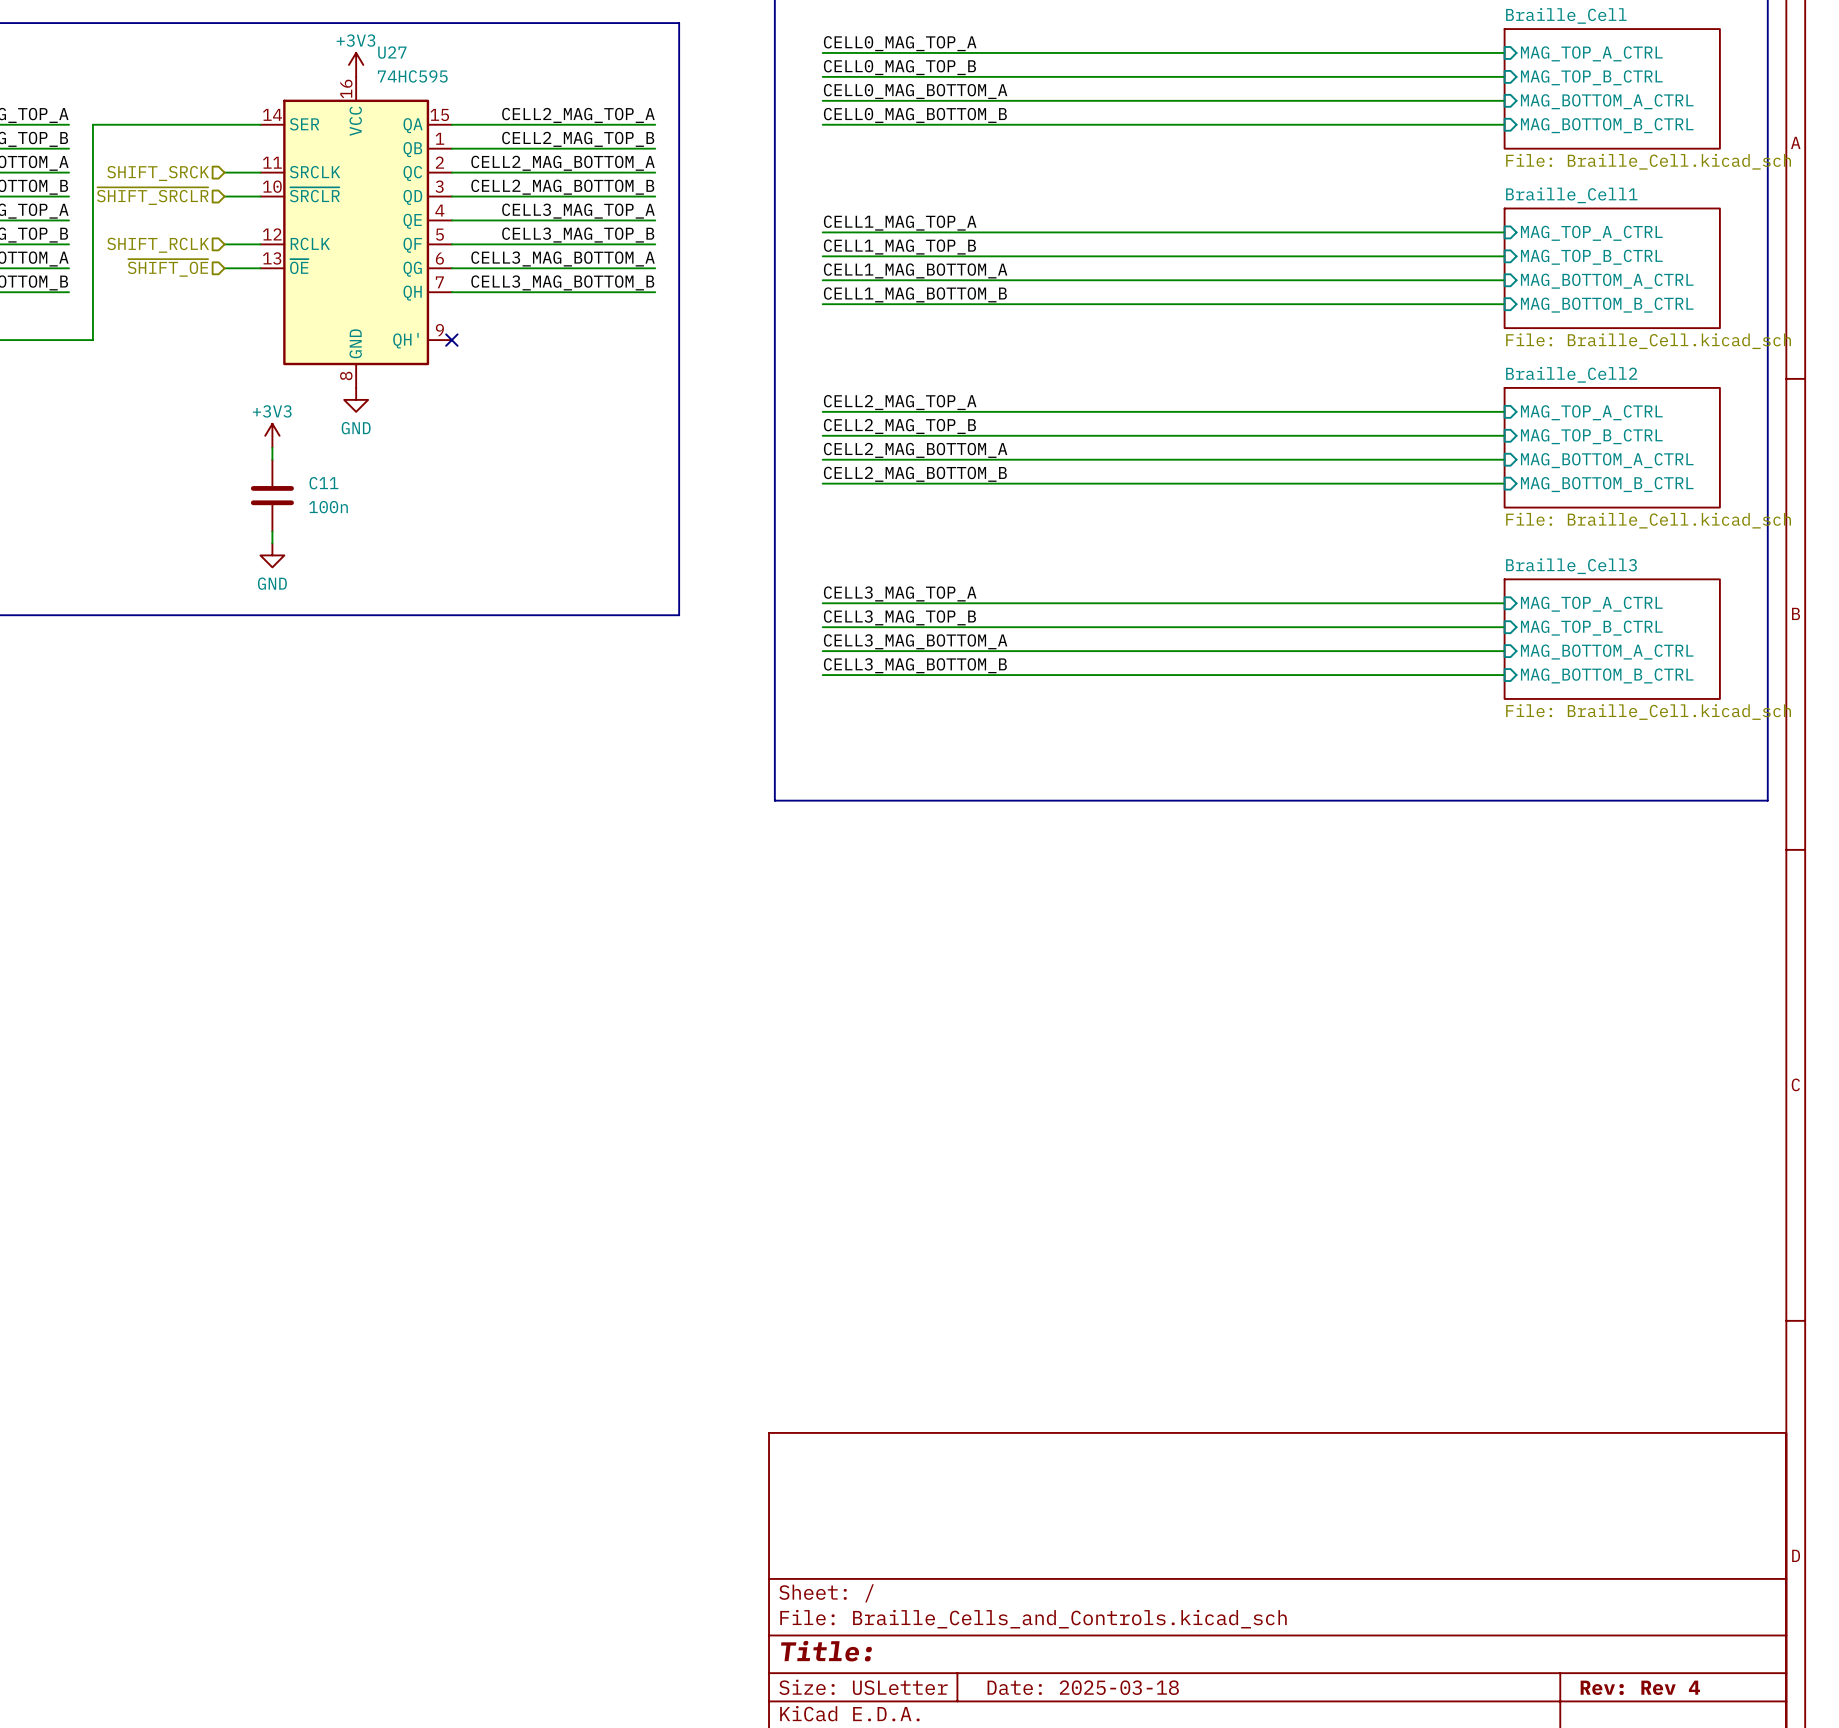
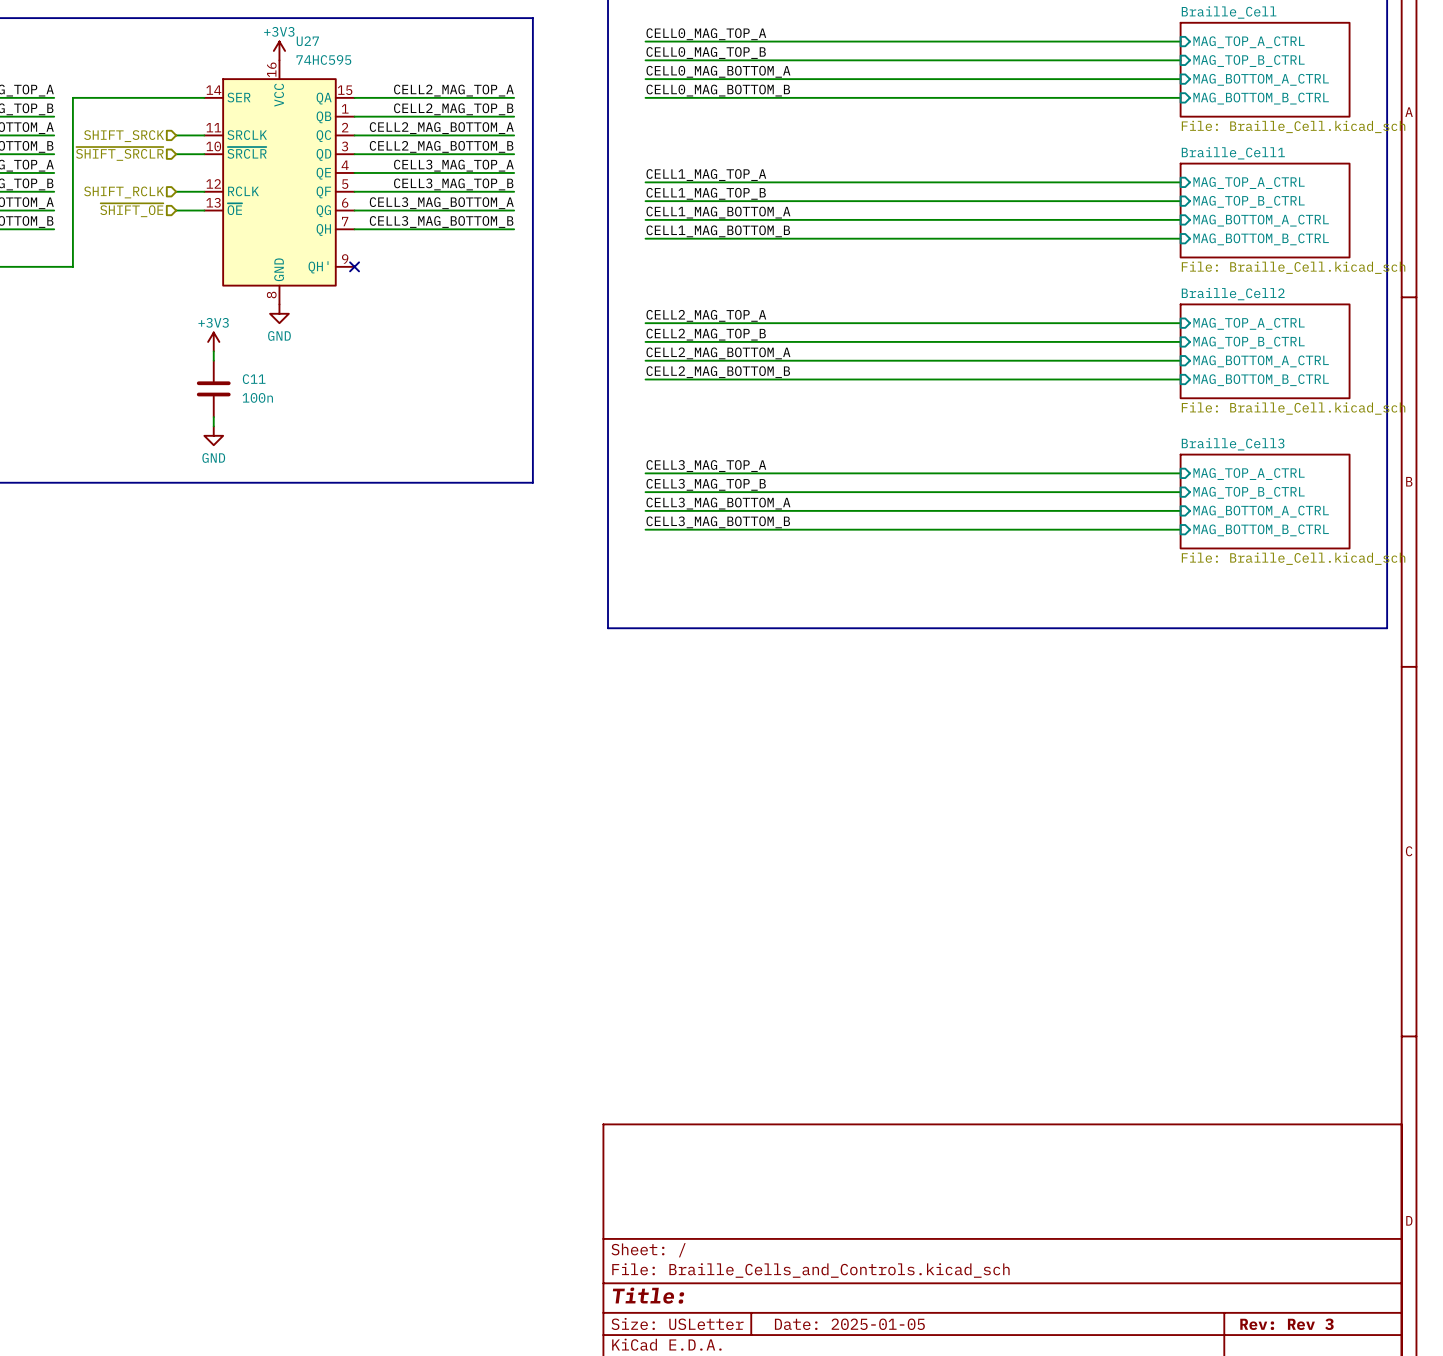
title block: Date: 2025-03-18 (1083, 1687) -> Date: 2025-01-05 (849, 1324)
title block: Rev: Rev 4 (1640, 1687) -> Rev: Rev 3 (1286, 1324)

